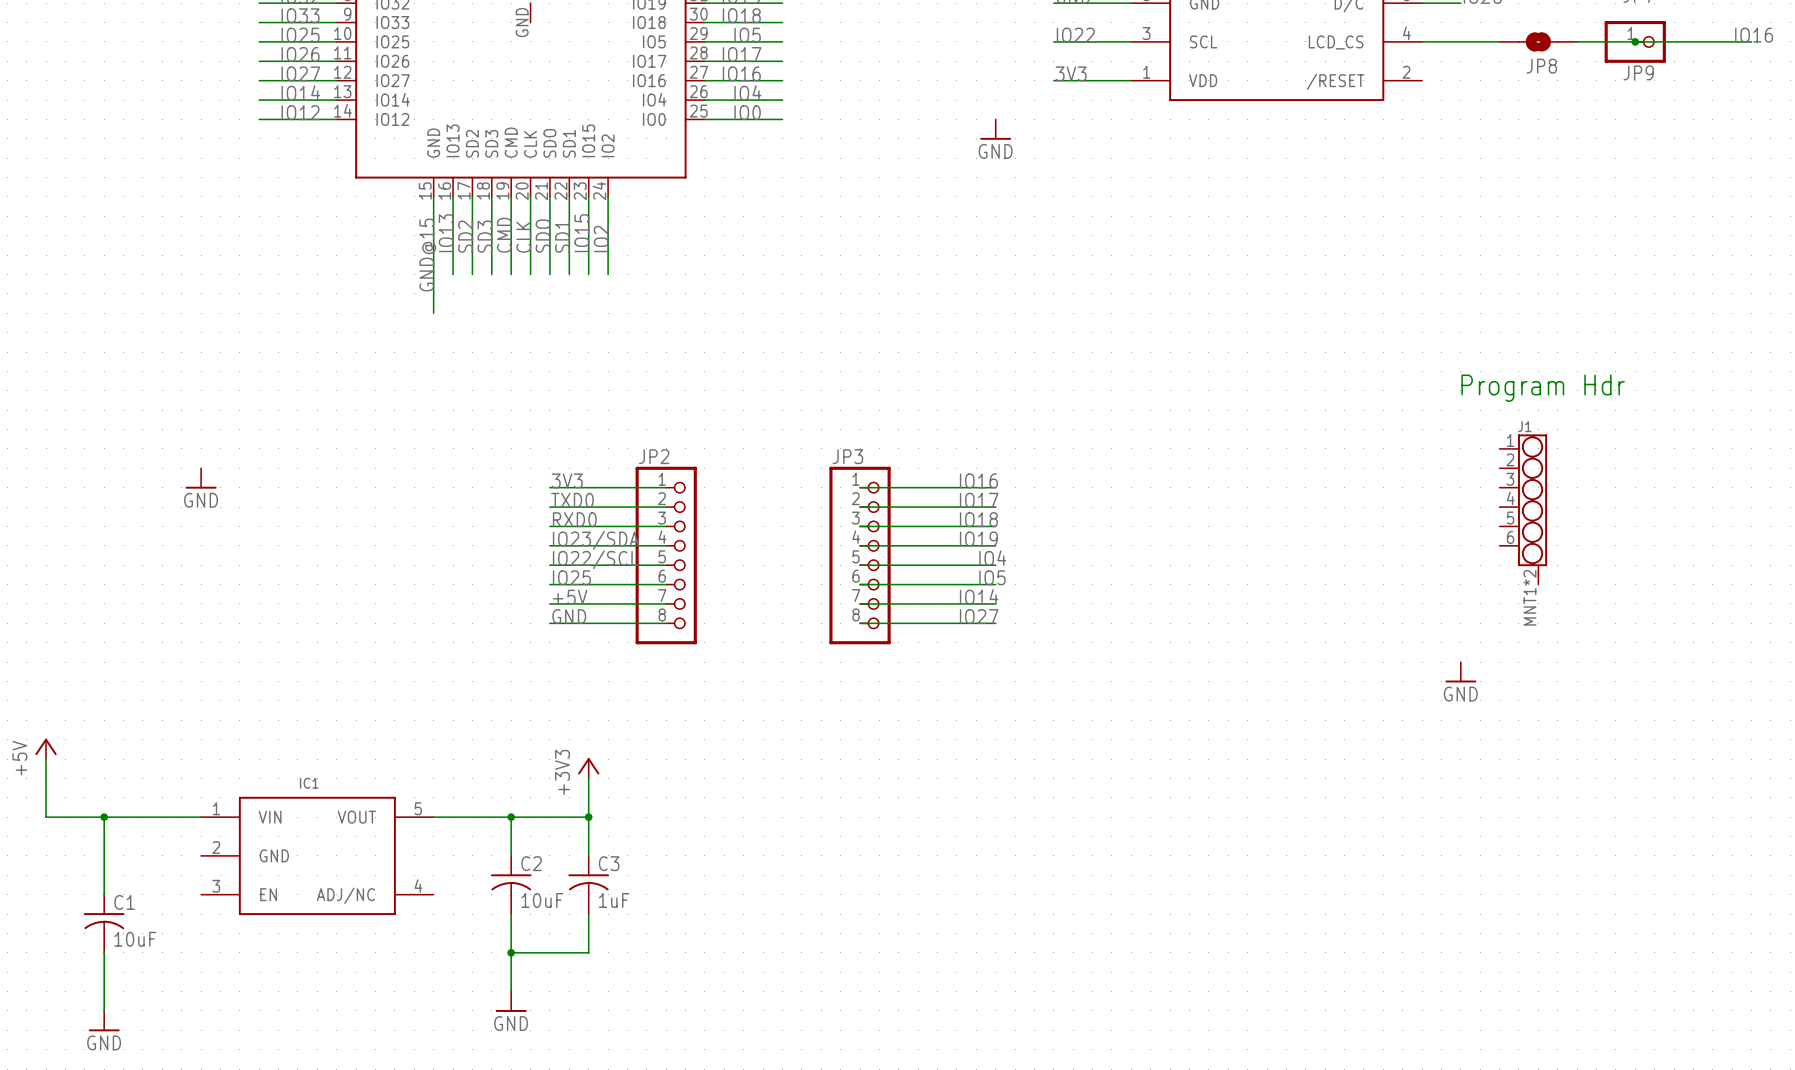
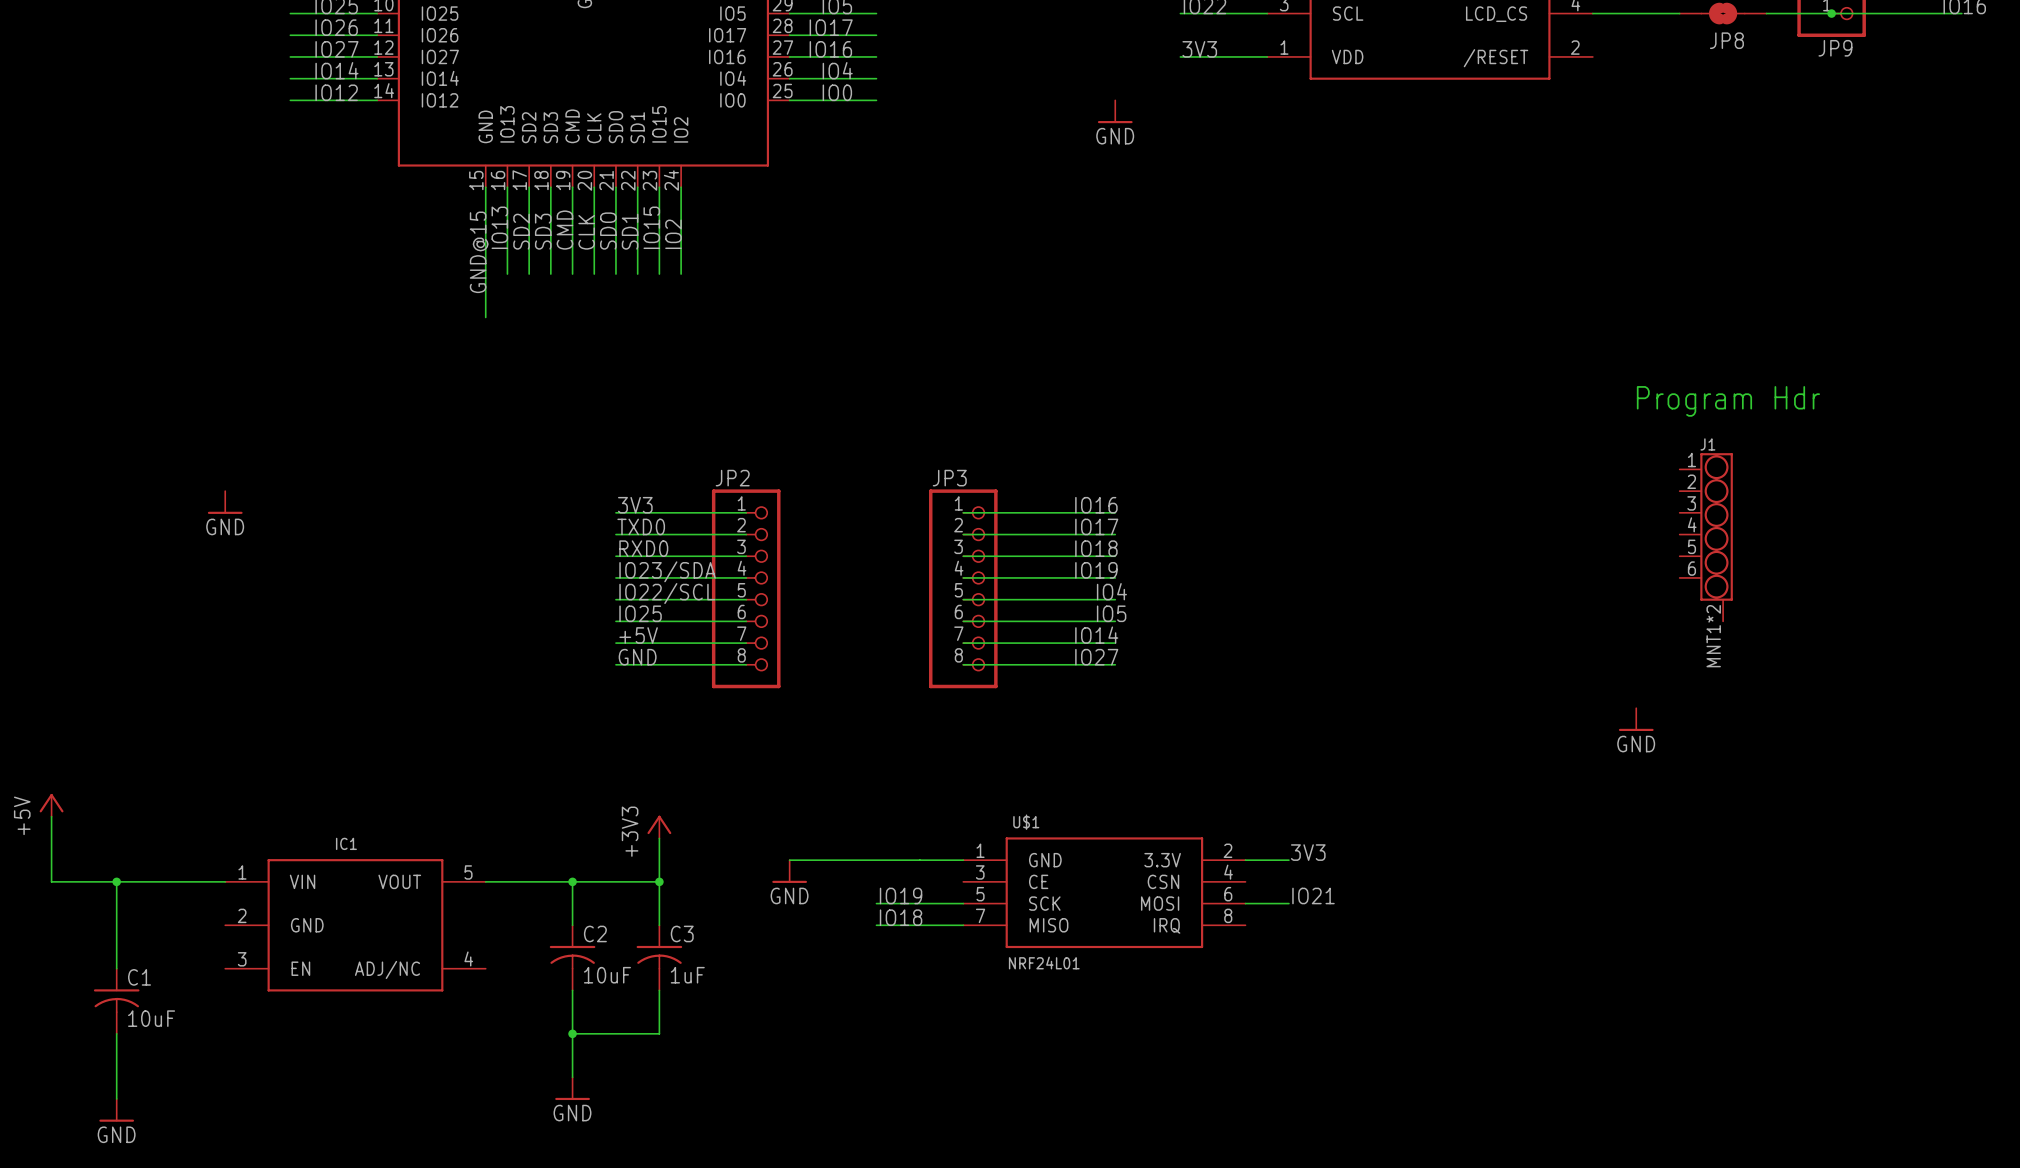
label: none -> 3V3 (1308, 852)
wire: none -> (789, 860) (963, 860)
wire: none -> (1245, 860) (1288, 860)
power symbol: none -> GND (789, 871)
U$1: none -> NRF24L01 (1104, 892)
label: none -> IO19 (901, 895)
label: none -> IO21 (1313, 895)
wire: none -> (876, 903) (963, 903)
wire: none -> (1245, 903) (1288, 903)
label: none -> IO18 (901, 917)
wire: none -> (876, 925) (963, 925)

